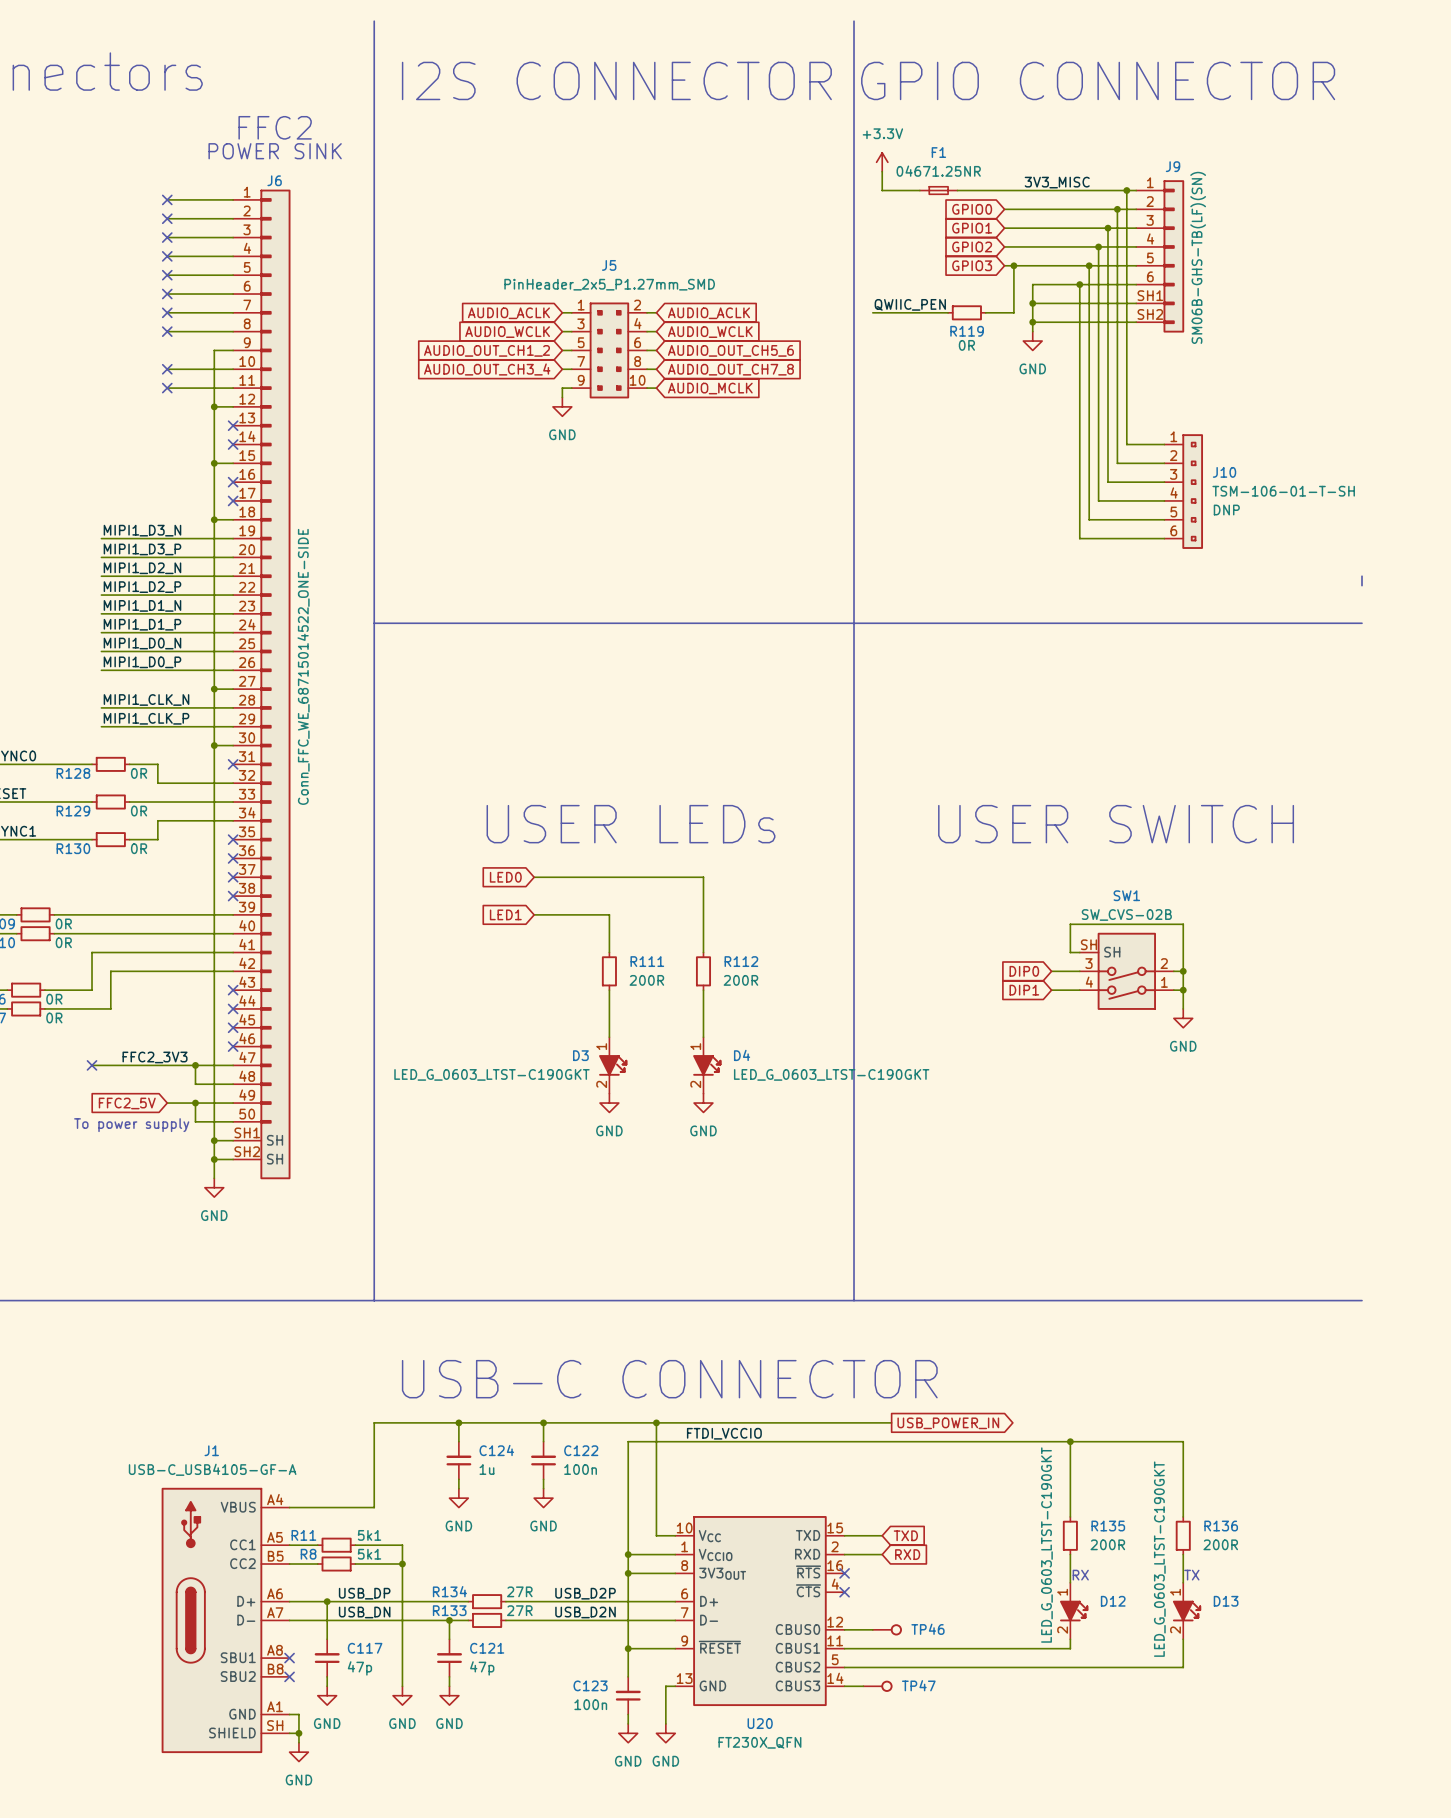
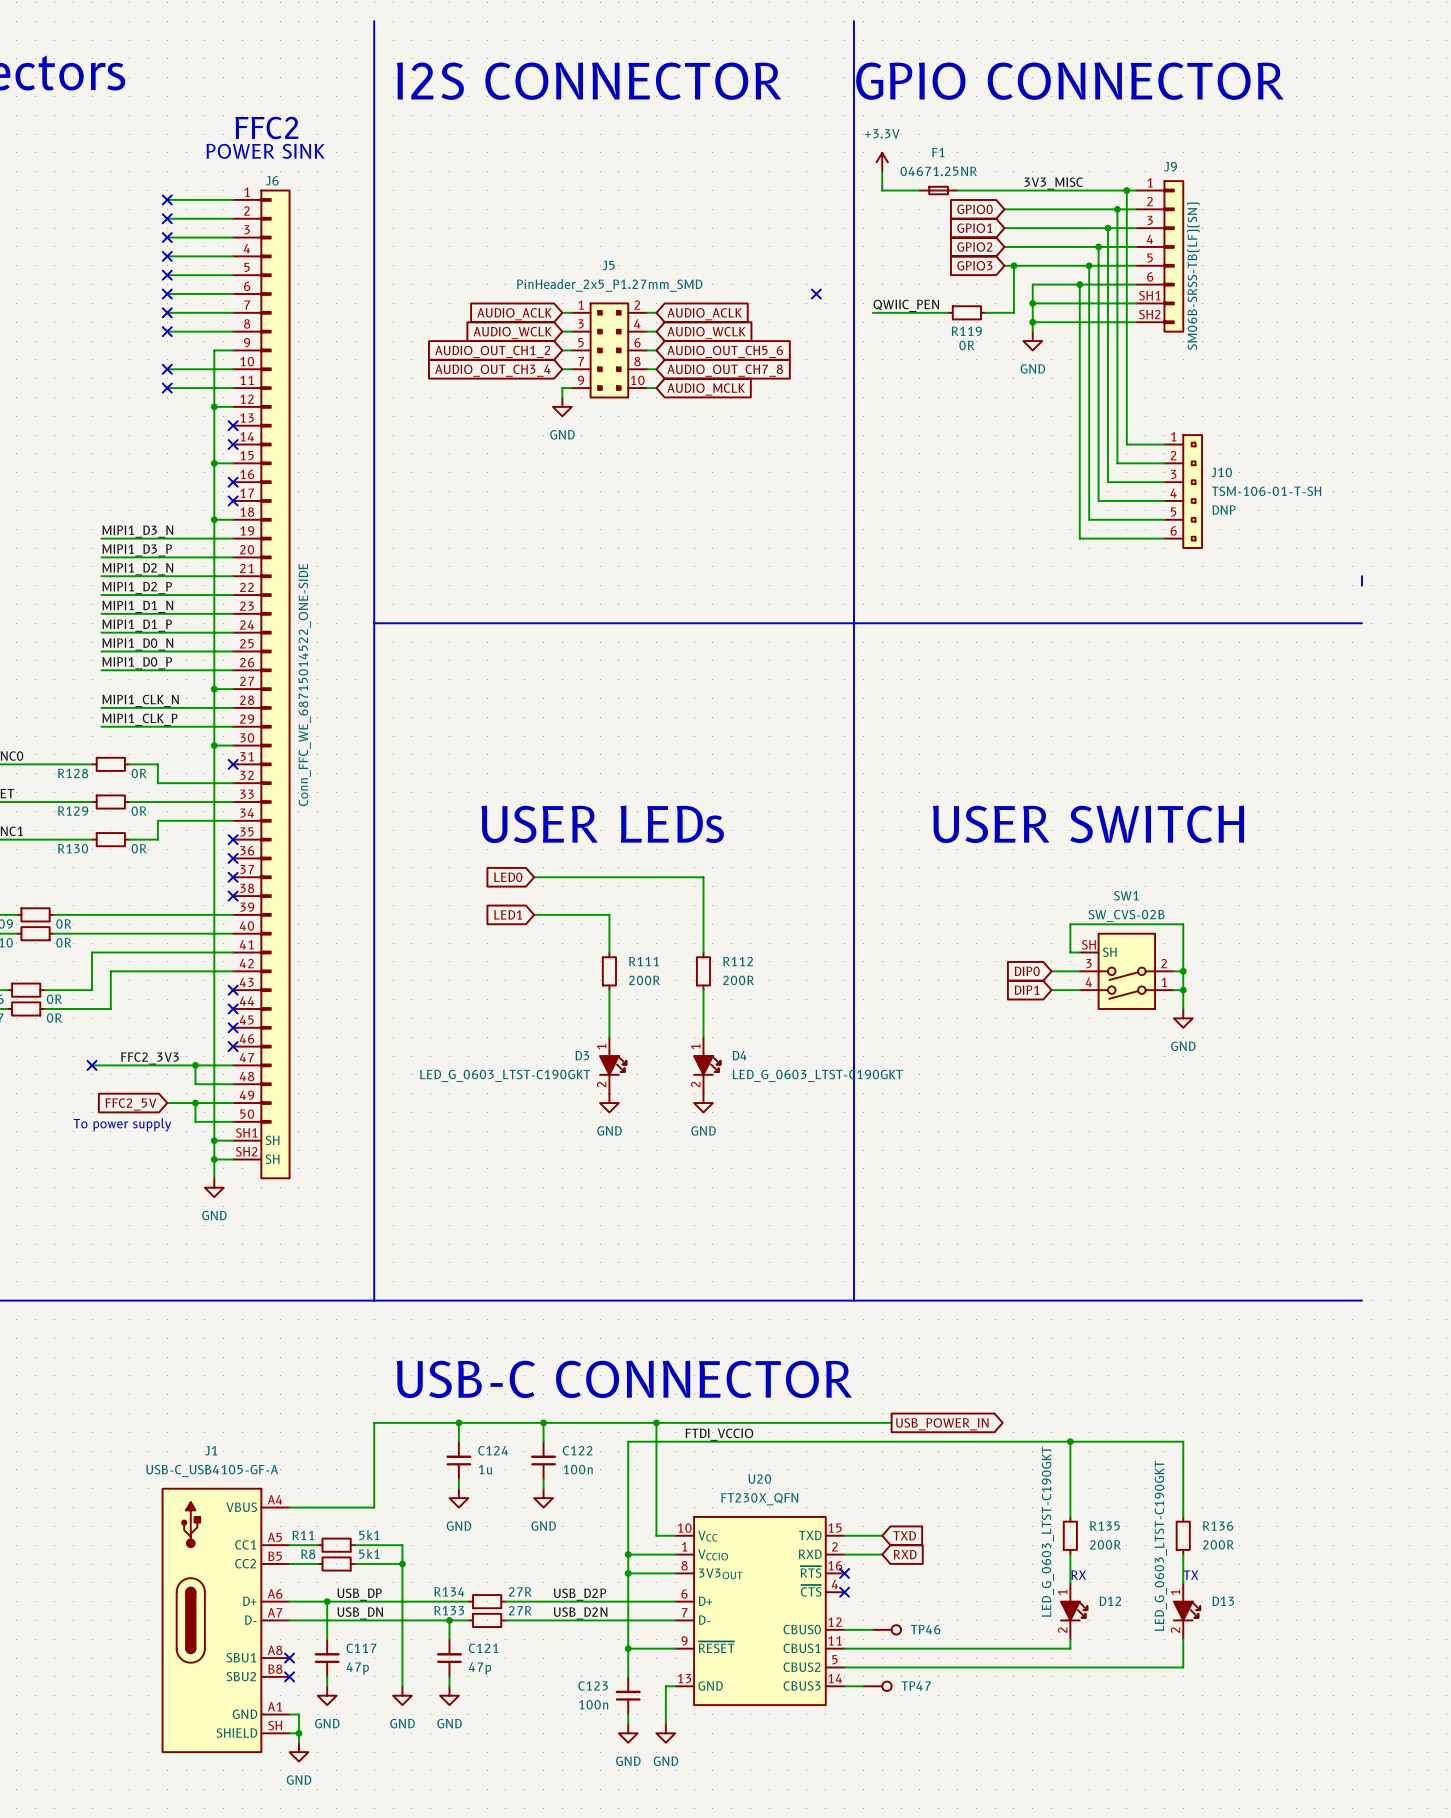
J9 text: SM06B-GHS-TB(LF)(SN) (1198, 257) -> SM06B-SRSS-TB(LF)(SN) (1193, 276)
no-connect mark: none -> (816, 294)
U20 name position: U20 (760, 1723) -> U20 (759, 1479)
U20 value position: FT230X_QFN (759, 1742) -> FT230X_QFN (759, 1499)

